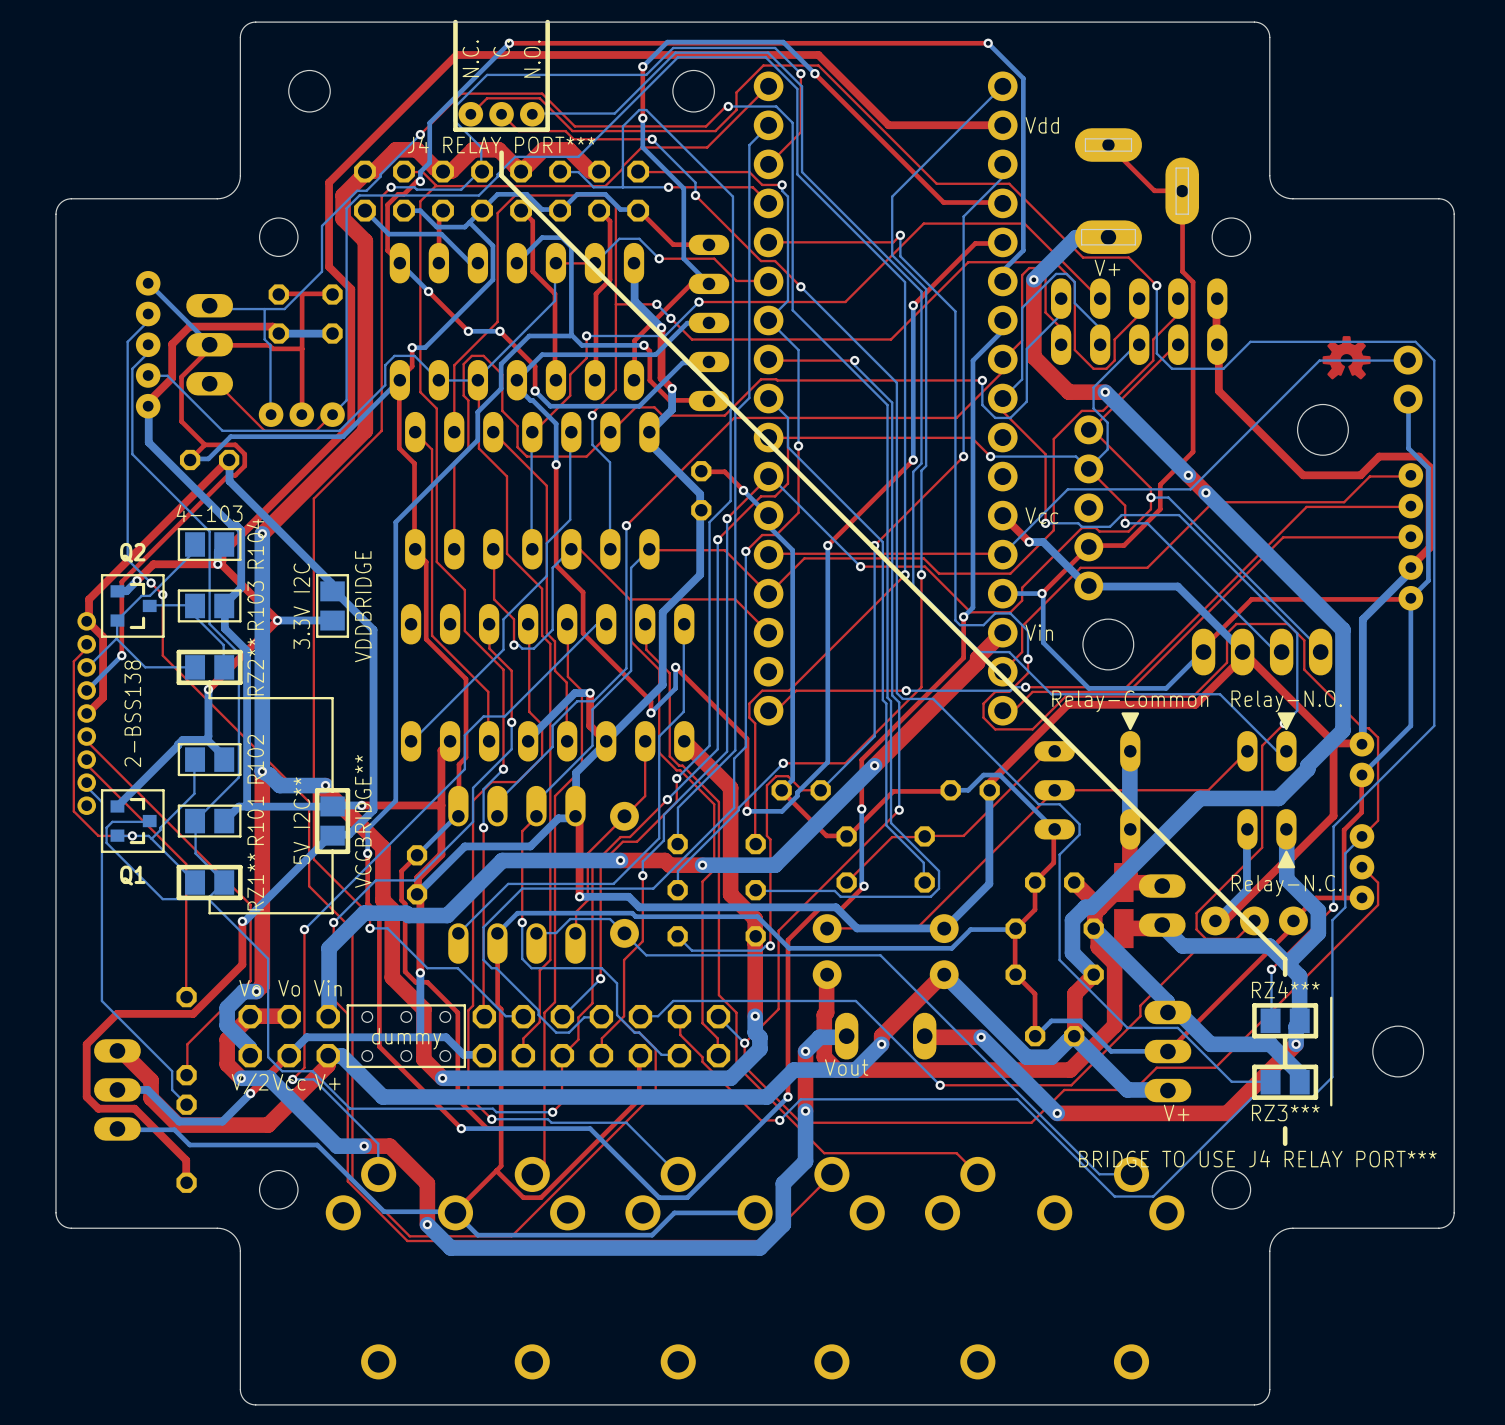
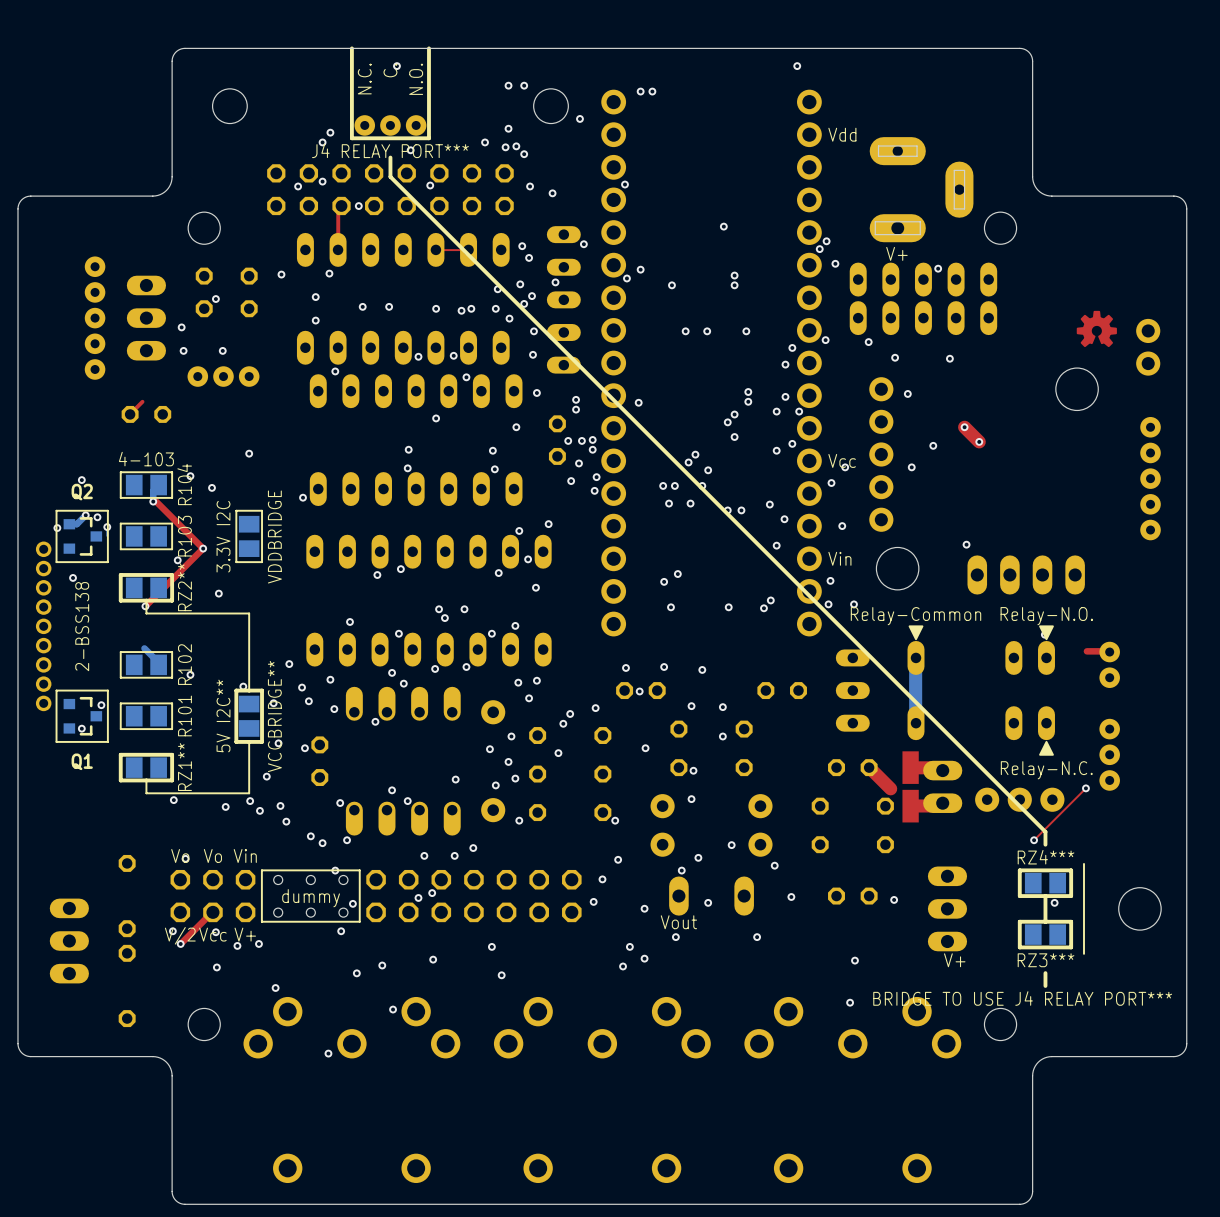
bottom track: (509, 43) (429, 122) (429, 162) (420, 172) (420, 181) -> none
top track: (988, 43) (509, 43) -> none
bottom track: (988, 43) (1023, 78) (1023, 250) (1003, 270) (1002, 281) -> none
top track: (642, 66) (642, 118) -> none
bottom track: (642, 66) (667, 42) (783, 42) (814, 73) -> none
via: none -> (524, 85)
top track: (800, 73) (800, 132) (768, 164) -> none
bottom track: (800, 73) (775, 47) (673, 47) (646, 74) (487, 74) (454, 107) (454, 120) (481, 147) (482, 171) (480, 170) (461, 189) (391, 187) -> none
top track: (814, 73) (943, 202) (1002, 203) -> none
top track: (768, 86) (707, 147) (641, 147) (605, 186) (436, 186) (422, 172) (403, 171) -> none
bottom track: (1002, 86) (892, 196) (892, 255) (926, 289) (926, 465) (921, 470) (921, 574) -> none
top track: (728, 106) (725, 106) (706, 126) (574, 126) (542, 93) (461, 93) (420, 134) -> none
bottom track: (728, 106) (776, 106) (792, 122) (792, 310) (887, 405) (887, 697) (891, 701) (891, 823) (939, 871) (939, 888) (930, 896) (840, 896) (834, 890) (755, 890) -> none
top track: (470, 114) (487, 98) (539, 98) (572, 131) (715, 131) (736, 110) (736, 92) (763, 65) (818, 65) (936, 183) (1009, 183) (1083, 257) (1128, 257) (1156, 285) -> none
top track: (501, 114) (518, 131) (565, 131) (573, 139) (652, 139) -> none
bottom track: (532, 114) (614, 113) (675, 52) (768, 52) (802, 86) (802, 172) (921, 291) (921, 463) (913, 471) (913, 585) (980, 652) (1009, 652) (1051, 694) (1220, 694) (1276, 750) (1286, 751) -> none
bottom track: (642, 118) (642, 147) (683, 188) (683, 258) (708, 283) -> none
via: none -> (330, 132)
bottom track: (768, 125) (749, 145) (749, 398) (735, 412) (735, 750) (677, 807) (677, 844) -> none
top track: (1002, 125) (888, 125) (818, 54) (456, 54) (329, 182) (329, 266) (351, 289) (351, 424) (222, 553) (221, 564) (153, 564) (137, 580) -> none
bottom track: (420, 134) (366, 190) (357, 190) (322, 225) (322, 271) (284, 309) (213, 309) (209, 305) -> none
via: none -> (485, 142)
bottom track: (652, 139) (695, 182) (695, 195) -> none
via: none -> (505, 147)
via: none -> (410, 150)
top track: (1108, 145) (1154, 190) (1182, 191) (1182, 271) (1193, 282) (1193, 451) (1160, 484) (1160, 509) (1124, 545) (1090, 545) (1042, 593) -> none
via: none -> (524, 154)
bottom track: (1002, 164) (1002, 177) (963, 216) (963, 456) -> none
bottom track: (560, 171) (578, 172) (593, 187) (668, 187) -> none
top track: (599, 171) (590, 170) (569, 149) (543, 149) (521, 171) (498, 149) (473, 149) (451, 170) (443, 171) (435, 168) (416, 149) (395, 149) (374, 170) (365, 170) (343, 195) (343, 218) (365, 241) (365, 430) (262, 533) -> none
top track: (638, 171) (749, 172) (762, 184) (782, 184) -> none
top track: (420, 181) (416, 181) (403, 194) (398, 194) (387, 204) (387, 250) (399, 263) -> none
bottom track: (782, 184) (782, 190) (787, 196) (787, 300) (768, 320) (798, 350) (798, 446) -> none
top track: (436, 185) (420, 201) (420, 392) (436, 408) (436, 561) (464, 590) (464, 631) (503, 669) (503, 769) -> none
via: none -> (430, 185)
top track: (391, 187) (381, 196) (381, 430) (313, 498) (313, 859) (370, 915) (370, 928) -> none
bottom track: (622, 187) (622, 126) (639, 110) (646, 110) (732, 196) (732, 407) (730, 409) (730, 501) (709, 522) (709, 745) (676, 778) -> none
top track: (668, 187) (752, 187) (768, 203) -> none
top track: (695, 195) (761, 261) (775, 261) (800, 286) -> none
bottom track: (364, 210) (388, 234) (441, 234) (469, 262) (477, 263) -> none
via: none -> (358, 206)
top track: (521, 210) (532, 221) (532, 271) (555, 293) (555, 380) -> none
top track: (599, 210) (610, 221) (610, 279) (595, 293) (594, 380) -> none
top track: (638, 210) (673, 244) (708, 244) -> none
bottom track: (638, 210) (620, 209) (605, 194) (577, 194) (560, 210) (542, 209) (526, 194) (497, 194) (464, 227) (436, 227) (420, 210) (403, 210) -> none
bottom track: (469, 222) (492, 245) (492, 279) (425, 347) (412, 347) -> none
top track: (900, 235) (893, 242) (768, 242) -> none
bottom track: (900, 235) (900, 256) (955, 311) (955, 620) (960, 625) (983, 625) (995, 613) (1010, 613) (1028, 631) (1028, 659) -> none
bottom track: (1108, 237) (1076, 237) (1033, 279) -> none
top track: (1002, 242) (975, 243) (913, 305) -> none
via: none -> (826, 241)
via: none -> (583, 244)
top track: (659, 258) (714, 258) (736, 280) (768, 281) -> none
bottom track: (659, 258) (639, 238) (619, 238) (594, 263) -> none
via: none -> (819, 249)
bottom track: (399, 263) (428, 291) -> none
bottom track: (516, 263) (542, 237) (562, 237) (571, 247) (571, 334) -> none
bottom track: (555, 263) (555, 300) (478, 376) (477, 380) -> none
bottom track: (634, 263) (634, 300) (661, 327) -> none
via: none -> (529, 257)
top track: (1033, 279) (1033, 357) (1068, 392) (1105, 392) -> none
bottom track: (148, 283) (209, 344) -> none
top track: (708, 283) (690, 284) (634, 340) (634, 380) -> none
bottom track: (1156, 285) (1156, 353) (1172, 368) (1223, 368) (1250, 341) (1415, 341) (1434, 360) (1434, 725) (1333, 826) (1333, 907) -> none
bottom track: (800, 286) (896, 382) (896, 693) (902, 698) (933, 698) (1038, 804) (1059, 804) (1079, 824) (1079, 834) (1059, 854) (1059, 960) (1127, 1027) (1177, 1027) (1231, 1081) (1270, 1082) -> none
top track: (428, 291) (468, 331) -> none
via: none -> (281, 274)
top track: (302, 293) (301, 414) -> none
via: none -> (734, 275)
top track: (332, 294) (278, 294) -> none
via: none -> (626, 278)
bottom track: (1061, 298) (1060, 314) (1026, 348) (1026, 401) (1010, 417) (995, 417) (982, 405) (982, 380) -> none
top track: (1100, 298) (1024, 223) (923, 223) (845, 302) (699, 302) -> none
top track: (1139, 298) (1138, 316) (1114, 339) (1114, 360) (1106, 368) (1093, 368) (1074, 350) (1074, 282) (1054, 262) (968, 262) (891, 339) (691, 339) (670, 318) -> none
top track: (1178, 298) (1177, 314) (1153, 339) (1153, 360) (1102, 410) (1081, 410) (1053, 439) (1053, 530) (1010, 573) (939, 573) (923, 558) (804, 558) (768, 593) (724, 550) (649, 549) -> none
top track: (1217, 298) (1216, 344) (1218, 347) (1218, 391) (1303, 475) (1360, 475) (1379, 456) (1419, 456) (1429, 467) (1429, 547) (1410, 567) -> none
bottom track: (699, 302) (665, 335) (586, 335) -> none
top track: (656, 304) (615, 304) -> none
bottom track: (656, 304) (670, 318) -> none
via: none -> (671, 285)
bottom track: (913, 305) (913, 460) -> none
bottom track: (264, 309) (264, 339) (270, 345) (271, 414) -> none
via: none -> (497, 289)
bottom track: (148, 314) (147, 321) (127, 341) (127, 559) (151, 583) -> none
via: none -> (315, 297)
bottom track: (1002, 320) (1002, 331) (972, 360) (972, 607) (963, 616) -> none
via: none -> (215, 299)
bottom track: (708, 322) (687, 323) (655, 354) (542, 354) (516, 380) (518, 388) (556, 423) (556, 464) -> none
top track: (661, 327) (661, 378) (672, 388) -> none
top track: (499, 331) (535, 366) (535, 391) -> none
bottom track: (499, 331) (468, 331) -> none
top track: (278, 333) (272, 326) (189, 326) (172, 344) (172, 378) (148, 401) (148, 406) -> none
bottom track: (332, 333) (278, 333) -> none
via: none -> (436, 308)
via: none -> (471, 308)
via: none -> (495, 308)
bottom track: (571, 334) (581, 345) (643, 345) -> none
bottom track: (571, 334) (529, 335) (501, 364) (501, 388) (477, 412) (477, 440) (395, 522) (395, 800) (367, 828) (367, 853) -> none
top track: (586, 335) (586, 358) (570, 374) (570, 395) (532, 432) -> none
bottom track: (148, 344) (147, 353) (132, 368) (132, 454) (209, 531) (209, 624) (238, 653) (238, 777) (195, 821) (195, 853) (224, 882) (207, 899) (162, 899) (106, 842) (106, 827) (112, 821) (149, 821) -> none
top track: (1061, 344) (1060, 327) (1045, 312) (1045, 275) (1038, 268) (1029, 268) (1022, 275) (1022, 340) (1002, 359) (1002, 372) (956, 417) (734, 417) (626, 525) -> none
bottom track: (1100, 344) (1099, 327) (1074, 303) (1074, 282) (1066, 273) (1056, 273) (1022, 307) (1022, 379) (1002, 398) -> none
bottom track: (1139, 344) (1135, 345) (1093, 387) (1093, 408) (1107, 422) (1107, 449) (1088, 468) (1076, 456) (990, 456) -> none
top track: (1178, 344) (1091, 429) (1088, 429) -> none
top track: (643, 345) (649, 351) (649, 380) (669, 400) (708, 400) -> none
top track: (412, 347) (412, 366) (399, 380) (399, 448) (414, 463) (414, 549) (426, 561) (426, 639) (466, 679) (466, 757) (459, 764) (458, 816) -> none
top track: (302, 348) (272, 348) (269, 345) (209, 344) (210, 347) (181, 376) (181, 421) (204, 444) (235, 444) (244, 454) (244, 465) (235, 475) (228, 475) (121, 581) (121, 655) -> none
via: none -> (181, 327)
top track: (768, 359) (854, 360) -> none
via: none -> (533, 331)
bottom track: (854, 360) (854, 365) (892, 402) (892, 695) (899, 702) (899, 810) -> none
via: none -> (707, 331)
via: none -> (746, 331)
bottom track: (1408, 360) (1319, 360) (1190, 489) (1067, 489) (1002, 554) -> none
bottom track: (708, 361) (682, 362) (639, 406) (550, 406) (535, 391) -> none
via: none -> (825, 340)
via: none -> (868, 342)
bottom track: (148, 375) (167, 375) (222, 430) (339, 430) (385, 385) (385, 365) (394, 355) (414, 355) (439, 380) (477, 380) -> none
bottom track: (399, 380) (343, 436) (230, 436) (208, 458) (190, 459) -> none
top track: (477, 380) (478, 448) (507, 476) (507, 553) (542, 588) (542, 635) (550, 643) (550, 960) (539, 970) (539, 1022) (523, 1038) (523, 1055) -> none
top track: (982, 380) (761, 379) (724, 415) (662, 415) (654, 407) (635, 407) (586, 456) (526, 456) (517, 447) (517, 426) (502, 410) (502, 374) (483, 355) (471, 355) (463, 364) (463, 395) (468, 400) (468, 448) (454, 462) (454, 549) -> none
top track: (209, 383) (217, 383) (264, 430) (316, 430) (332, 414) -> none
via: none -> (183, 350)
via: none -> (222, 350)
bottom track: (672, 388) (672, 409) (649, 432) (649, 443) (700, 494) (700, 574) (662, 612) (662, 684) (576, 772) (576, 816) (572, 818) (558, 818) (530, 846) (464, 846) (417, 894) -> none
via: none -> (453, 355)
bottom track: (1105, 392) (1188, 475) -> none
via: none -> (949, 358)
bottom track: (768, 398) (787, 417) (787, 447) (882, 542) (882, 700) (886, 703) (886, 825) (923, 862) (924, 882) -> none
top track: (1002, 398) (1003, 412) (1045, 454) (1045, 523) -> none
bottom track: (1408, 399) (1408, 448) (1428, 468) (1428, 580) (1410, 598) (1410, 725) (1361, 774) -> none
via: none -> (785, 364)
bottom track: (148, 406) (148, 442) (231, 525) (236, 525) (241, 530) (241, 587) (224, 605) (224, 628) (247, 650) (247, 806) -> none
via: none -> (335, 371)
bottom track: (332, 414) (346, 400) (346, 208) (359, 195) (478, 195) (515, 156) (578, 156) (677, 57) (765, 57) (797, 88) (797, 174) (905, 282) (905, 574) -> none
top track: (592, 415) (592, 413) (615, 389) (615, 206) (605, 195) (515, 195) (497, 213) (497, 321) (454, 365) (454, 431) -> none
bottom track: (592, 415) (592, 444) (610, 462) (610, 549) -> none
top track: (1088, 429) (1092, 429) (1150, 488) (1150, 509) (1128, 531) (1099, 531) (1095, 527) (1081, 527) (1022, 587) (1022, 600) (1010, 612) (970, 612) (924, 566) (860, 566) -> none
top track: (415, 432) (432, 449) (432, 635) (488, 691) (489, 741) -> none
top track: (493, 432) (546, 485) (546, 633) (555, 641) (555, 670) (566, 682) (567, 741) -> none
bottom track: (532, 432) (532, 549) -> none
bottom track: (571, 432) (570, 519) (546, 543) (546, 575) (503, 619) (503, 649) (411, 741) -> none
via: none -> (748, 392)
via: none -> (536, 392)
via: none -> (907, 393)
top track: (768, 437) (971, 437) (990, 456) -> none
top track: (787, 437) (787, 483) (775, 496) (761, 496) (717, 539) -> none
via: none -> (785, 396)
via: none -> (576, 399)
via: none -> (748, 401)
top track: (798, 446) (798, 512) (776, 535) (762, 535) (745, 551) -> none
via: none -> (576, 409)
top track: (963, 456) (874, 545) -> none
top track: (229, 459) (89, 599) (89, 618) (86, 621) (103, 636) (103, 697) (86, 713) -> none
bottom track: (229, 459) (229, 481) (331, 583) (332, 592) (336, 592) (373, 629) (373, 810) (348, 834) (332, 834) (329, 837) (244, 921) (242, 921) -> none
top track: (913, 460) (827, 545) -> none
top track: (556, 464) (556, 565) (583, 592) (583, 633) (651, 701) (651, 712) -> none
top track: (1088, 468) (1125, 505) (1125, 523) -> none
via: none -> (727, 422)
top track: (701, 471) (724, 471) (743, 490) -> none
via: none -> (516, 427)
top track: (1410, 475) (1369, 476) (1344, 502) (1212, 502) (1147, 567) (1080, 567) (1022, 626) (1022, 652) (1002, 671) -> none
top track: (768, 476) (727, 518) -> none
bottom track: (768, 476) (860, 566) -> none
via: none -> (734, 437)
bottom track: (743, 490) (768, 515) (769, 526) (792, 550) (792, 779) (781, 790) -> none
via: none -> (568, 440)
via: none -> (581, 440)
bottom track: (1205, 492) (1342, 629) (1342, 730) (1278, 798) (1200, 798) (1091, 907) (1085, 907) (1072, 920) (1072, 952) (1093, 974) -> none
via: none -> (792, 443)
bottom track: (1150, 497) (1168, 497) (1319, 648) (1320, 652) -> none
via: none -> (408, 449)
via: none -> (592, 449)
via: none -> (492, 450)
via: none -> (776, 450)
via: none -> (249, 453)
top track: (1410, 506) (1306, 506) (1126, 687) (1025, 687) -> none
via: none -> (695, 454)
top track: (1002, 515) (1029, 542) -> none
via: none -> (688, 462)
bottom track: (727, 518) (727, 751) (663, 814) (663, 840) (642, 861) (642, 875) -> none
bottom track: (1045, 523) (1078, 523) (1081, 526) (1109, 526) (1121, 515) (1179, 515) (1297, 633) (1297, 710) (1284, 723) -> none
bottom track: (1125, 523) (1147, 523) (1275, 650) (1281, 652) -> none
via: none -> (407, 468)
bottom track: (626, 525) (626, 668) (593, 701) (577, 701) (552, 725) (552, 746) (497, 801) (497, 816) -> none
via: none -> (708, 470)
bottom track: (262, 533) (262, 771) (269, 775) (279, 785) (325, 785) -> none
via: none -> (596, 477)
top track: (1410, 536) (1283, 537) (1128, 691) (1032, 691) (1013, 710) (1002, 710) -> none
via: none -> (81, 480)
bottom track: (717, 539) (717, 749) (667, 799) -> none
bottom track: (1029, 542) (1043, 542) (1088, 586) (1177, 586) (1242, 652) -> none
bottom track: (195, 544) (194, 551) (149, 595) (141, 595) (117, 620) (117, 638) (86, 667) -> none
bottom track: (827, 545) (827, 762) (797, 792) (797, 796) (782, 811) (747, 811) -> none
via: none -> (674, 485)
bottom track: (874, 545) (874, 736) (820, 790) -> none
via: none -> (211, 487)
top track: (493, 549) (494, 599) (514, 619) (514, 645) -> none
top track: (571, 549) (580, 550) (629, 599) (735, 599) (768, 632) -> none
bottom track: (571, 549) (552, 567) (552, 629) (533, 648) (522, 648) (518, 645) (514, 645) -> none
bottom track: (649, 549) (631, 567) (631, 670) (592, 709) (592, 745) (537, 800) (536, 816) -> none
bottom track: (745, 551) (745, 746) (734, 758) (734, 807) (653, 888) (522, 888) (483, 927) (483, 960) (491, 968) (496, 968) (538, 1010) (538, 1015) (556, 1032) (569, 1032) (584, 1017) (601, 1016) -> none
top track: (1002, 554) (768, 554) -> none
via: none -> (303, 497)
via: none -> (669, 503)
via: none -> (769, 504)
bottom track: (1410, 567) (1409, 572) (1362, 619) (1361, 744) -> none
top track: (905, 574) (789, 690) (762, 690) (749, 703) (749, 717) (755, 723) (755, 844) -> none
top track: (921, 574) (921, 687) (845, 763) (783, 763) -> none
top track: (151, 583) (162, 594) (162, 655) (309, 801) (309, 886) (352, 929) (352, 1178) (409, 1236) (511, 1236) (655, 1092) (655, 1048) (639, 1032) (634, 1032) (621, 1019) -> none
via: none -> (784, 519)
via: none -> (548, 524)
bottom track: (1002, 593) (1043, 594) (1043, 642) (1088, 688) (1166, 688) (1203, 652) -> none
via: none -> (57, 528)
top track: (1410, 598) (1251, 599) (1203, 647) (1203, 652) -> none
top track: (631, 599) (631, 641) (659, 669) (659, 752) (676, 770) (680, 770) (714, 804) (714, 869) (702, 881) (702, 1023) (717, 1038) (718, 1055) -> none
via: none -> (519, 530)
bottom track: (149, 605) (194, 605) (195, 616) (223, 645) (224, 667) -> none
via: none -> (966, 544)
top track: (963, 616) (963, 657) (861, 759) (861, 808) -> none
bottom track: (332, 620) (277, 620) -> none
top track: (489, 624) (489, 648) (511, 670) (511, 722) -> none
top track: (528, 624) (529, 711) (542, 724) (542, 757) (517, 782) (491, 782) (473, 800) (473, 1005) (468, 1010) (468, 1095) (491, 1119) -> none
top track: (567, 624) (567, 676) (581, 690) (581, 769) (555, 796) (555, 1002) (544, 1012) (544, 1162) (532, 1174) -> none
bottom track: (606, 624) (595, 625) (504, 716) (483, 716) (464, 735) (464, 769) (304, 929) -> none
top track: (645, 624) (646, 649) (669, 673) (669, 756) (679, 765) (682, 765) (718, 801) (718, 995) (736, 1012) (736, 1065) (824, 1153) (956, 1153) (977, 1174) -> none
bottom track: (684, 624) (683, 711) (659, 736) (659, 838) (613, 883) (508, 883) (458, 933) -> none
top track: (1002, 632) (977, 657) (977, 662) (874, 765) -> none
via: none -> (528, 559)
via: none -> (177, 560)
bottom track: (116, 638) (145, 667) (195, 667) -> none
top track: (86, 644) (86, 648) (73, 661) (73, 811) (98, 835) (132, 835) -> none
via: none -> (498, 573)
via: none -> (677, 574)
via: none -> (377, 575)
bottom track: (121, 655) (86, 690) -> none
top track: (1028, 659) (1028, 673) (1009, 691) (995, 691) (983, 703) (983, 717) (995, 729) (1032, 729) (1065, 696) (1193, 696) (1227, 662) (1227, 633) (1236, 624) (1287, 624) (1304, 640) (1304, 669) (1362, 728) (1368, 728) (1378, 737) (1378, 820) (1361, 836) -> none
via: none -> (664, 581)
top track: (675, 667) (747, 738) (747, 811) -> none
bottom track: (675, 667) (675, 688) (651, 712) -> none
via: none -> (218, 593)
via: none -> (770, 600)
bottom track: (1025, 687) (1013, 687) (1010, 690) (906, 690) -> none
via: none -> (854, 604)
bottom track: (208, 689) (207, 739) (182, 739) (117, 806) -> none
via: none -> (670, 607)
top track: (906, 690) (796, 690) (776, 710) (768, 710) -> none
via: none -> (763, 608)
via: none -> (439, 609)
top track: (590, 693) (590, 725) (606, 741) -> none
bottom track: (590, 693) (574, 693) (528, 741) -> none
via: none -> (444, 618)
via: none -> (349, 621)
bottom track: (511, 722) (511, 749) (473, 787) (473, 821) (414, 880) (375, 880) (333, 922) -> none
via: none -> (491, 633)
top track: (1284, 723) (1262, 745) (1262, 847) (1196, 913) (1196, 929) (1206, 939) -> none
top track: (86, 736) (87, 742) (250, 904) (250, 981) (187, 1044) (186, 1075) -> none
top track: (450, 741) (441, 750) (441, 854) (418, 878) (417, 894) (420, 900) (420, 972) -> none
top track: (645, 741) (645, 796) (587, 853) (587, 900) (576, 912) (575, 933) -> none
top track: (684, 741) (730, 787) (730, 894) (755, 919) (755, 1016) -> none
top track: (1054, 751) (1047, 751) (963, 835) (892, 837) (846, 882) -> none
top track: (1247, 751) (1208, 790) (1054, 790) -> none
via: none -> (289, 664)
top track: (86, 759) (87, 765) (186, 864) (186, 997) -> none
bottom track: (195, 759) (194, 793) (151, 838) -> none
via: none -> (466, 667)
via: none -> (664, 667)
bottom track: (783, 763) (677, 871) (677, 890) -> none
via: none -> (435, 668)
bottom track: (874, 765) (775, 865) (702, 865) -> none
bottom track: (503, 769) (483, 789) (483, 827) -> none
top track: (262, 771) (262, 985) (256, 991) -> none
top track: (1361, 774) (1361, 812) (1344, 830) (1344, 897) -> none
via: none -> (330, 679)
top track: (676, 778) (676, 801) (636, 841) (622, 841) (600, 864) (600, 978) -> none
via: none -> (518, 682)
bottom track: (86, 782) (87, 787) (101, 801) (101, 1000) (172, 1071) (172, 1089) (186, 1104) -> none
via: none -> (403, 683)
top track: (325, 785) (325, 790) (382, 847) (382, 900) (392, 909) (392, 977) (423, 1009) (423, 1059) (442, 1078) -> none
via: none -> (302, 687)
top track: (820, 790) (802, 790) (787, 776) (776, 776) (766, 785) (766, 835) (770, 839) (770, 945) -> none
top track: (950, 790) (893, 791) (846, 836) (826, 835) (781, 790) -> none
bottom track: (950, 790) (968, 790) (983, 775) (999, 775) (1054, 829) -> none
top track: (989, 790) (990, 782) (1067, 704) (1195, 704) (1243, 656) (1243, 652) (1334, 743) (1333, 816) (1225, 920) (1215, 920) -> none
bottom track: (989, 790) (989, 883) (944, 928) (857, 928) (835, 907) (639, 907) (628, 896) (579, 896) -> none
top track: (1054, 790) (916, 928) (827, 928) -> none
via: none -> (639, 691)
top track: (667, 799) (629, 837) (620, 837) (592, 865) (592, 1003) (578, 1017) (578, 1039) (562, 1056) (562, 1102) (552, 1112) -> none
via: none -> (308, 701)
bottom track: (361, 805) (238, 806) (224, 821) -> none
top track: (441, 805) (361, 805) -> none
via: none -> (101, 705)
bottom track: (861, 808) (861, 883) (864, 886) -> none
top track: (899, 810) (778, 930) (778, 1009) (744, 1043) (744, 1066) (800, 1122) (1031, 1122) (1064, 1089) (1134, 1089) (1156, 1067) (1215, 1067) (1378, 904) (1378, 882) (1361, 867) -> none
via: none -> (334, 709)
bottom track: (458, 816) (417, 855) -> none
top track: (536, 816) (522, 831) (522, 922) -> none
top track: (575, 816) (579, 820) (579, 896) -> none
via: none -> (570, 713)
top track: (483, 827) (484, 1016) -> none
top track: (1054, 829) (1053, 862) (1035, 882) -> none
top track: (1130, 829) (1129, 875) (1094, 913) (1093, 928) (1098, 935) (1098, 947) (1114, 963) (1114, 1025) (1070, 1070) (837, 1070) (824, 1057) (827, 974) -> none
bottom track: (1247, 829) (1246, 889) (1215, 920) -> none
bottom track: (1286, 829) (1286, 879) (1318, 910) (1318, 933) (1287, 964) -> none
via: none -> (563, 723)
bottom track: (117, 835) (148, 835) (195, 882) -> none
bottom track: (1361, 836) (1345, 853) (1345, 907) (1332, 920) (1332, 1077) (1311, 1098) (1251, 1098) (1153, 1196) (1114, 1196) (1017, 1099) (800, 1099) (779, 1120) -> none
via: none -> (511, 736)
via: none -> (722, 736)
top track: (367, 853) (367, 903) (379, 915) (379, 1046) (461, 1128) -> none
top track: (417, 855) (401, 871) (401, 900) (405, 903) (405, 971) (415, 982) (427, 982) (457, 1012) (457, 1099) (487, 1128) (501, 1128) -> none
via: none -> (304, 748)
via: none -> (645, 748)
top track: (620, 860) (665, 860) (669, 865) (702, 865) -> none
bottom track: (620, 860) (502, 860) (447, 915) (364, 913) (329, 948) (328, 1016) -> none
top track: (642, 875) (642, 941) (624, 960) (624, 1016) (601, 1038) (601, 1055) -> none
top track: (1035, 882) (1035, 909) (1015, 929) (1015, 972) (1035, 993) (1035, 1036) -> none
top track: (864, 886) (841, 908) (819, 908) (787, 940) (787, 1096) -> none
via: none -> (266, 776)
via: none -> (515, 778)
top track: (1361, 897) (1316, 897) (1293, 920) (1292, 927) (1167, 1051) -> none
bottom track: (207, 898) (268, 958) (268, 1057) (282, 1071) (312, 1071) (350, 1108) (492, 1108) (496, 1112) (552, 1112) -> none
via: none -> (495, 785)
via: none -> (392, 790)
via: none -> (691, 799)
top track: (1254, 920) (1236, 938) (1207, 938) (1140, 1005) (1140, 1016) (1071, 1085) (940, 1085) -> none
top track: (242, 921) (242, 964) (193, 1013) (117, 1013) (86, 1044) (86, 1096) (98, 1108) (134, 1108) (186, 1160) (186, 1182) -> none
top track: (333, 922) (333, 999) (347, 1013) (347, 1181) (407, 1241) (765, 1241) (831, 1174) -> none
bottom track: (522, 922) (522, 958) (531, 968) (601, 968) (617, 983) (617, 1015) (634, 1032) (639, 1032) (661, 1054) (679, 1055) -> none
via: none -> (340, 803)
bottom track: (1162, 925) (1182, 945) (1269, 945) (1299, 976) (1299, 1020) (1296, 1026) (1296, 1044) -> none
bottom track: (370, 928) (387, 928) (427, 968) (457, 968) (505, 1016) (523, 1016) -> none
bottom track: (1015, 928) (970, 929) (951, 948) (789, 948) (757, 916) (635, 916) (632, 913) (517, 913) (497, 933) -> none
bottom track: (1093, 928) (1167, 1002) (1167, 1012) (1179, 1012) (1210, 1044) (1270, 1044) (1299, 1073) (1299, 1082) -> none
top track: (304, 929) (304, 1067) (292, 1079) -> none
top track: (497, 933) (497, 1005) (501, 1009) (501, 1166) (455, 1212) -> none
bottom track: (536, 933) (556, 933) (570, 919) (610, 919) (646, 955) (880, 955) (1099, 1174) (1131, 1174) -> none
via: none -> (259, 810)
bottom track: (677, 936) (691, 950) (761, 950) (765, 945) (770, 945) -> none
via: none -> (519, 820)
via: none -> (286, 821)
via: none -> (310, 836)
via: none -> (347, 840)
bottom track: (1271, 969) (1270, 1020) -> none
bottom track: (420, 972) (420, 1037) -> none
top track: (944, 974) (881, 1036) (881, 1044) -> none
bottom track: (944, 974) (1026, 1057) (1051, 1057) (1074, 1036) (1127, 1089) (1167, 1090) -> none
top track: (1093, 974) (1074, 993) (1074, 1036) -> none
via: none -> (731, 845)
bottom track: (600, 978) (562, 1016) -> none
via: none -> (424, 855)
via: none -> (454, 855)
via: none -> (698, 857)
bottom track: (256, 991) (243, 991) (227, 1008) (227, 1025) (249, 1047) (250, 1055) -> none
via: none -> (618, 859)
via: none -> (774, 865)
via: none -> (335, 870)
via: none -> (681, 870)
top track: (289, 1016) (250, 1016) (227, 1039) (227, 1064) (241, 1078) -> none
bottom track: (640, 1016) (658, 1016) (673, 1000) (855, 1000) (940, 1085) -> none
top track: (679, 1016) (680, 1034) (702, 1057) (702, 1061) (761, 1120) (779, 1120) -> none
bottom track: (718, 1016) (744, 1043) -> none
bottom track: (755, 1016) (755, 1032) (759, 1037) (759, 1048) (730, 1078) (442, 1078) -> none
via: none -> (432, 893)
bottom track: (846, 1036) (819, 1037) (805, 1051) -> none
top track: (924, 1036) (981, 1037) -> none
bottom track: (1035, 1036) (1051, 1020) (1080, 1020) (1111, 1051) (1167, 1051) -> none
bottom track: (981, 1037) (1057, 1113) -> none
via: none -> (418, 897)
via: none -> (894, 899)
bottom track: (881, 1044) (855, 1070) (793, 1070) (766, 1096) (382, 1096) (341, 1056) (328, 1055) -> none
top track: (1296, 1044) (1227, 1113) (1057, 1113) -> none
via: none -> (352, 903)
top track: (117, 1050) (121, 1051) (151, 1080) (151, 1098) (178, 1125) (268, 1125) (327, 1065) (328, 1055) -> none
top track: (805, 1051) (805, 1111) -> none
bottom track: (484, 1055) (463, 1054) (446, 1037) (306, 1037) (289, 1055) -> none
top track: (640, 1055) (639, 1099) (540, 1197) (523, 1197) (496, 1170) -> none
bottom track: (241, 1078) (269, 1078) (337, 1146) (364, 1146) -> none
bottom track: (292, 1079) (313, 1079) (378, 1143) (378, 1174) -> none
via: none -> (675, 937)
bottom track: (117, 1089) (147, 1089) (179, 1121) (222, 1121) (250, 1093) -> none
via: none -> (258, 943)
via: none -> (237, 945)
via: none -> (491, 946)
bottom track: (787, 1096) (687, 1197) (659, 1197) (590, 1128) (461, 1128) -> none
bottom track: (805, 1111) (805, 1161) (783, 1183) (783, 1224) (759, 1248) (450, 1248) (427, 1224) -> none
bottom track: (491, 1119) (547, 1119) (551, 1122) (626, 1122) (678, 1174) -> none
via: none -> (216, 967)
bottom track: (117, 1128) (174, 1129) (189, 1145) (317, 1145) (384, 1211) (454, 1211) (477, 1235) (652, 1235) (674, 1212) (755, 1212) -> none
via: none -> (501, 975)
top track: (364, 1146) (389, 1146) (427, 1183) (427, 1224) -> none
via: none -> (850, 1002)
via: none -> (393, 1009)

